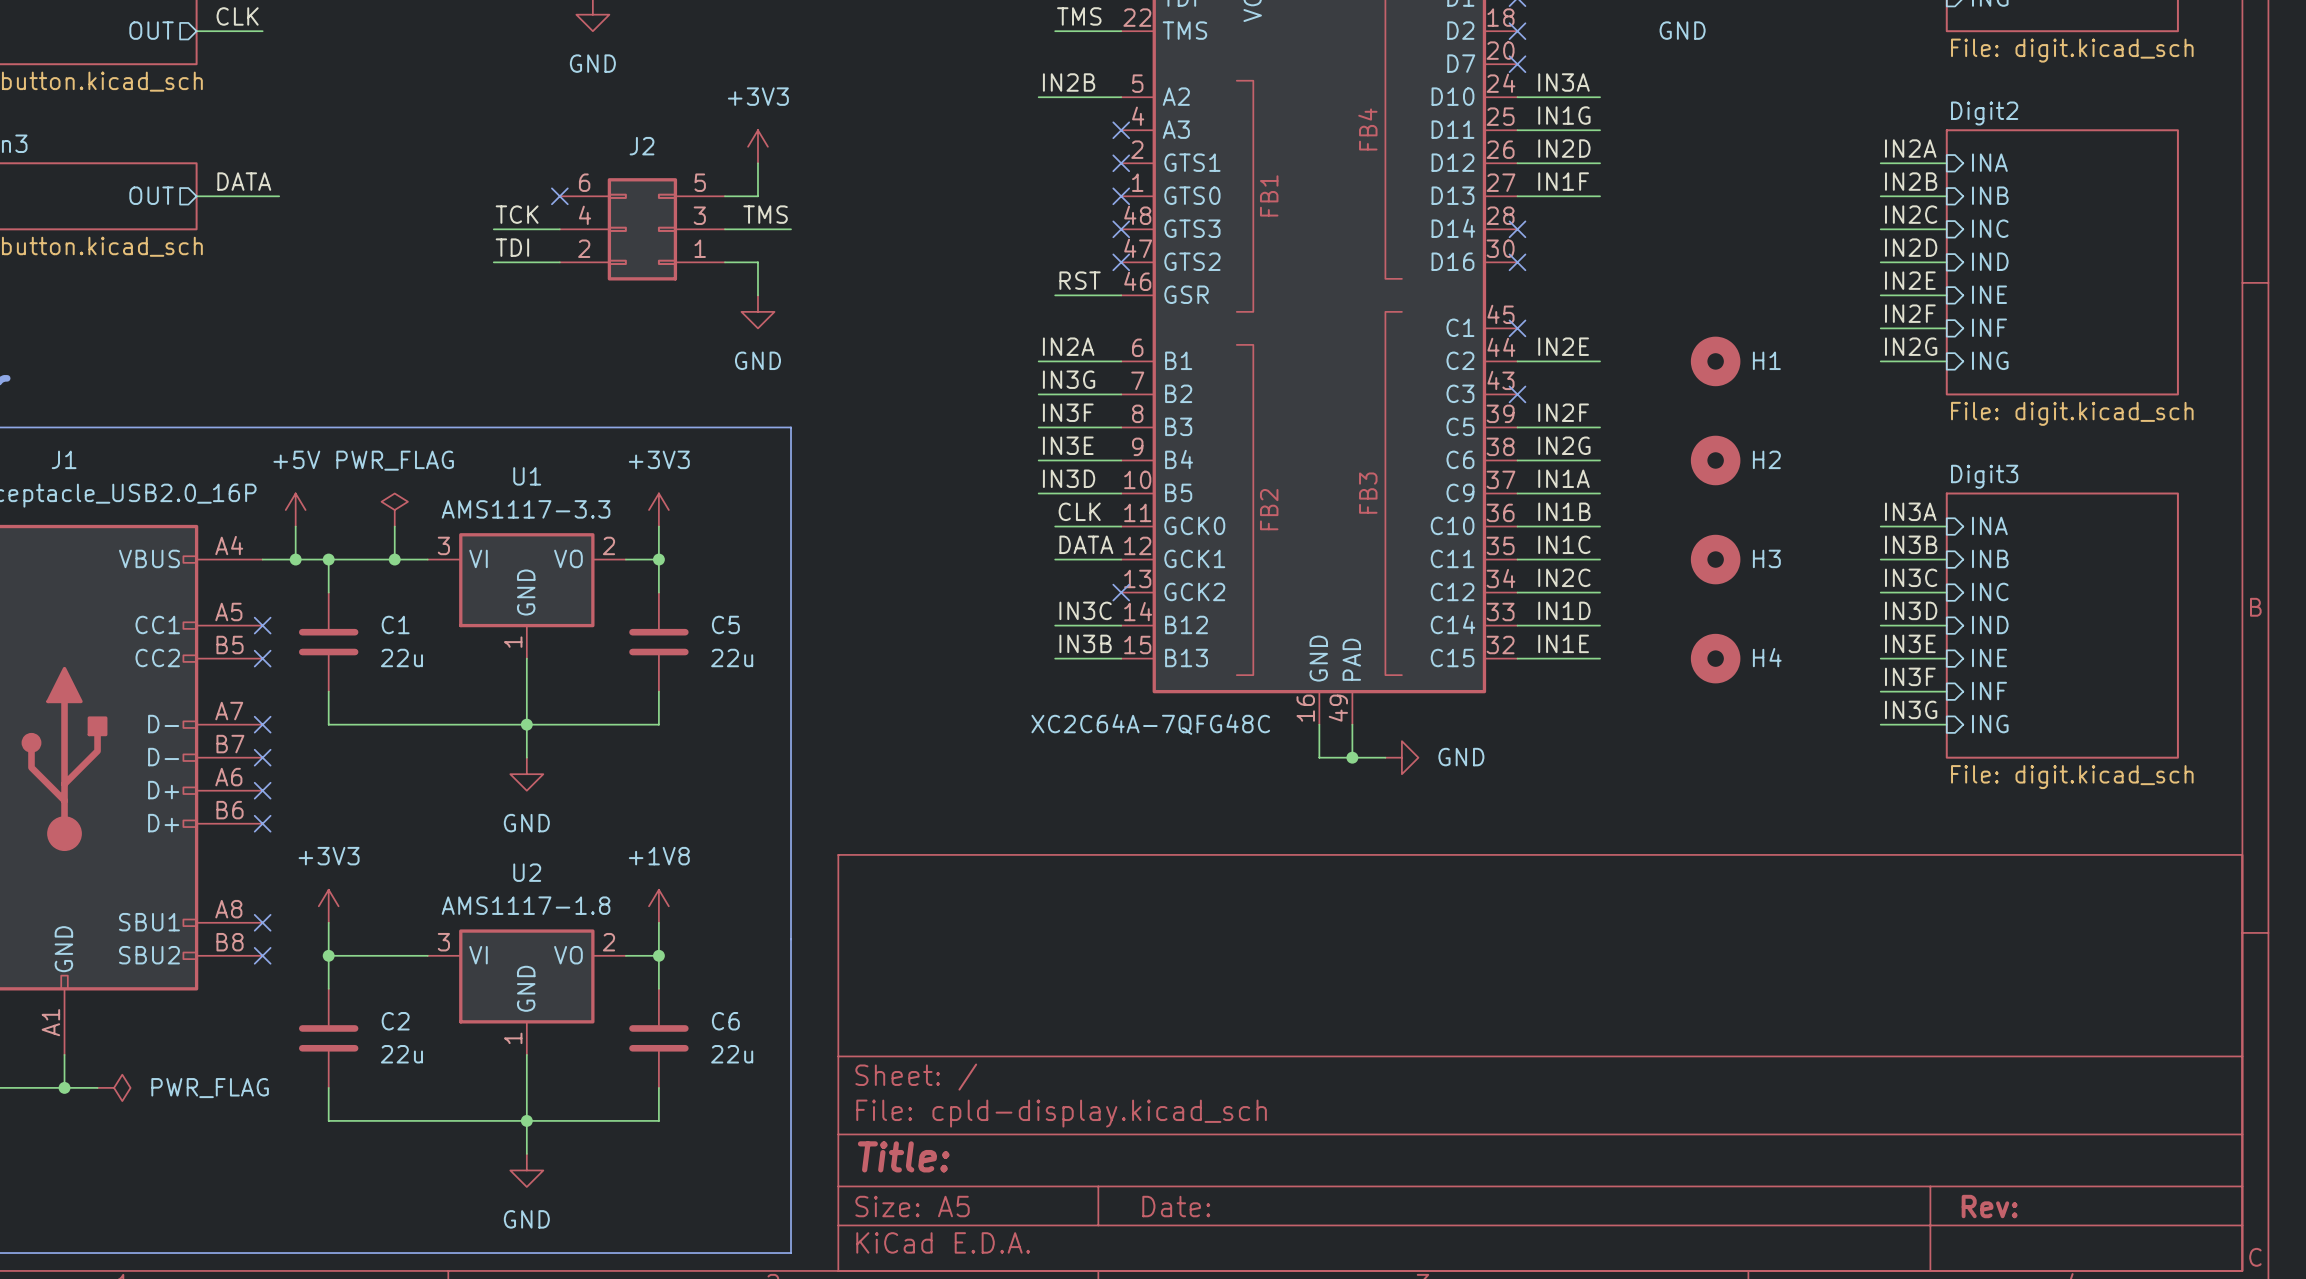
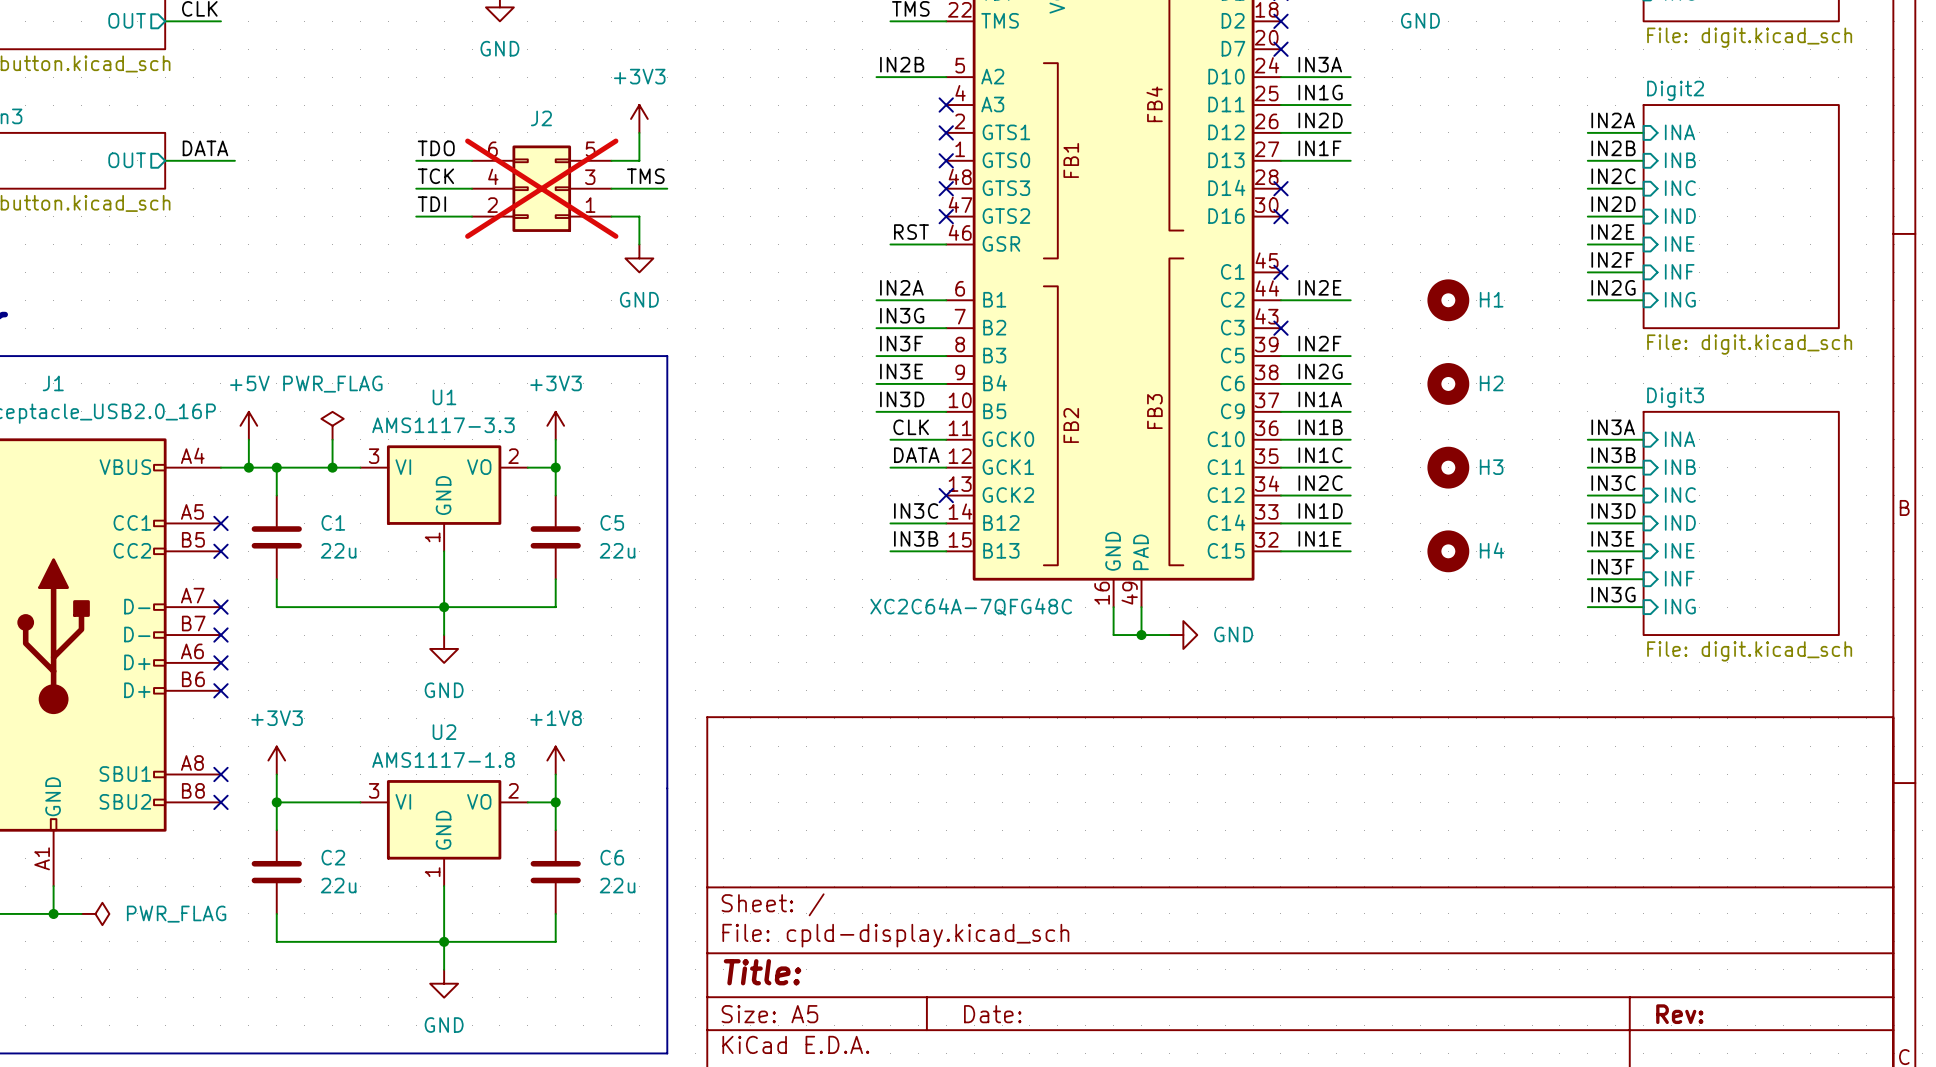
label: none -> TDO (436, 148)
wire: none -> (416, 160) (472, 160)
no-connect mark: (559, 196) -> none
J2 do-not-place cross: none -> (541, 188)

